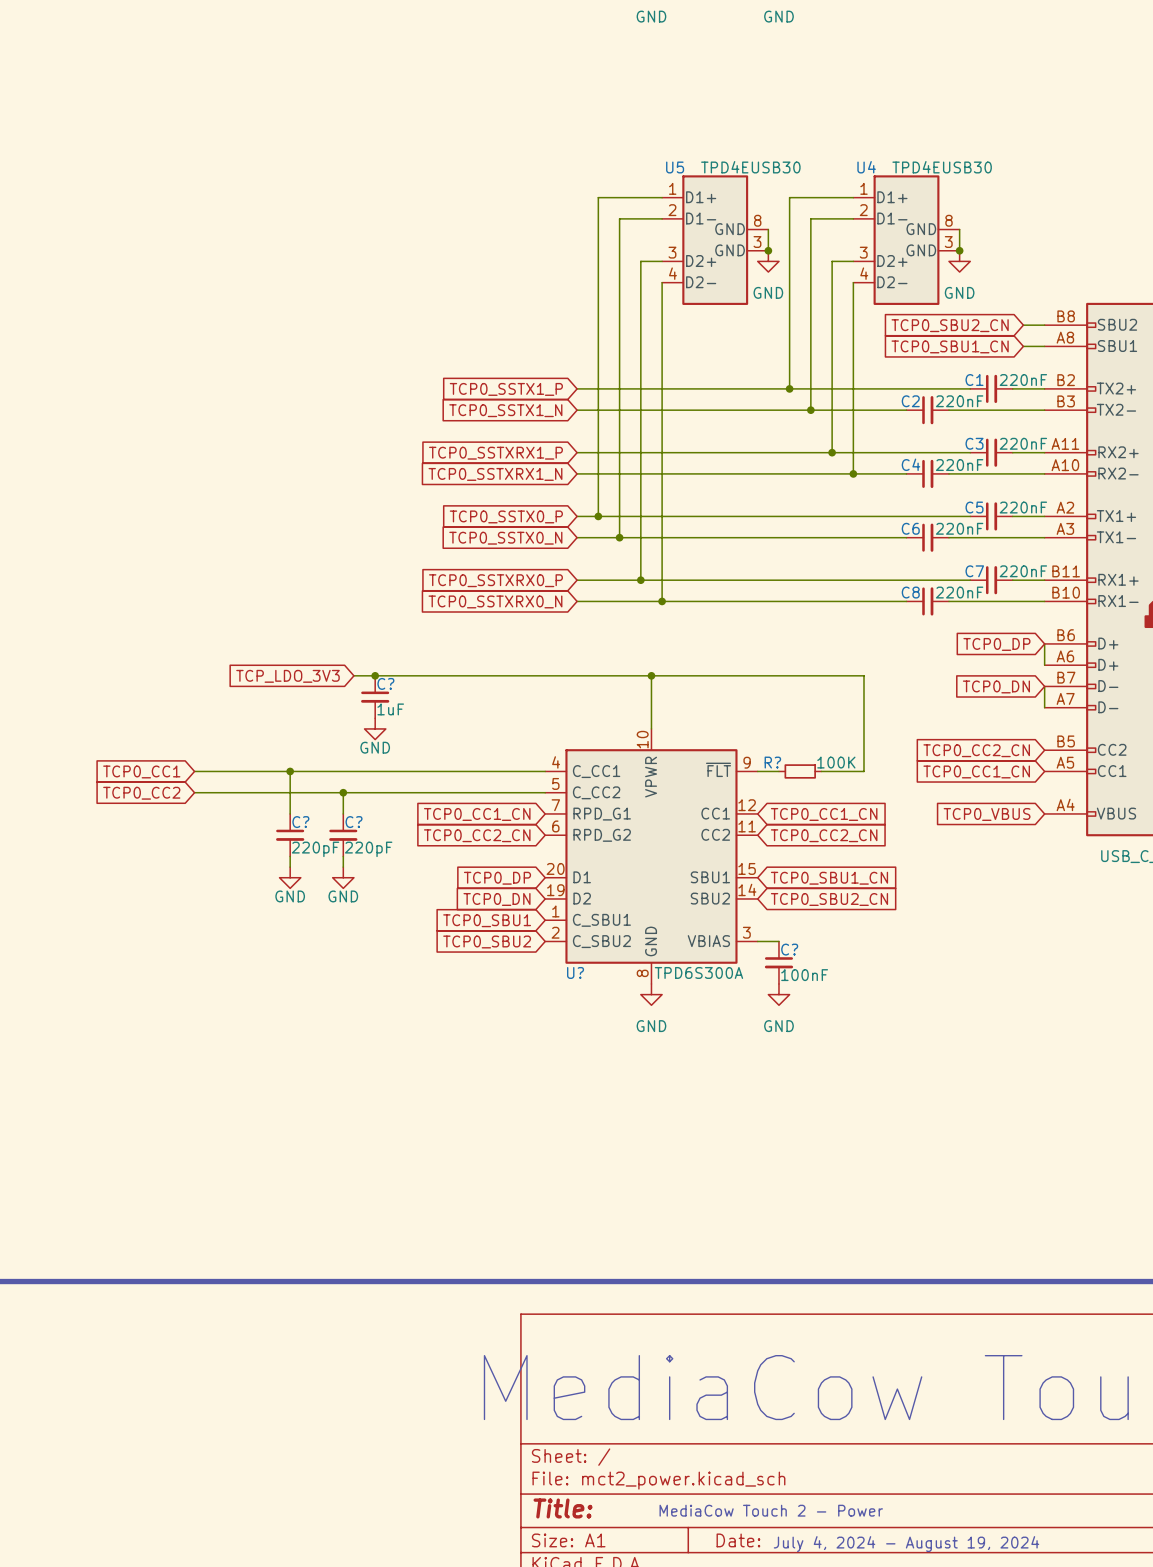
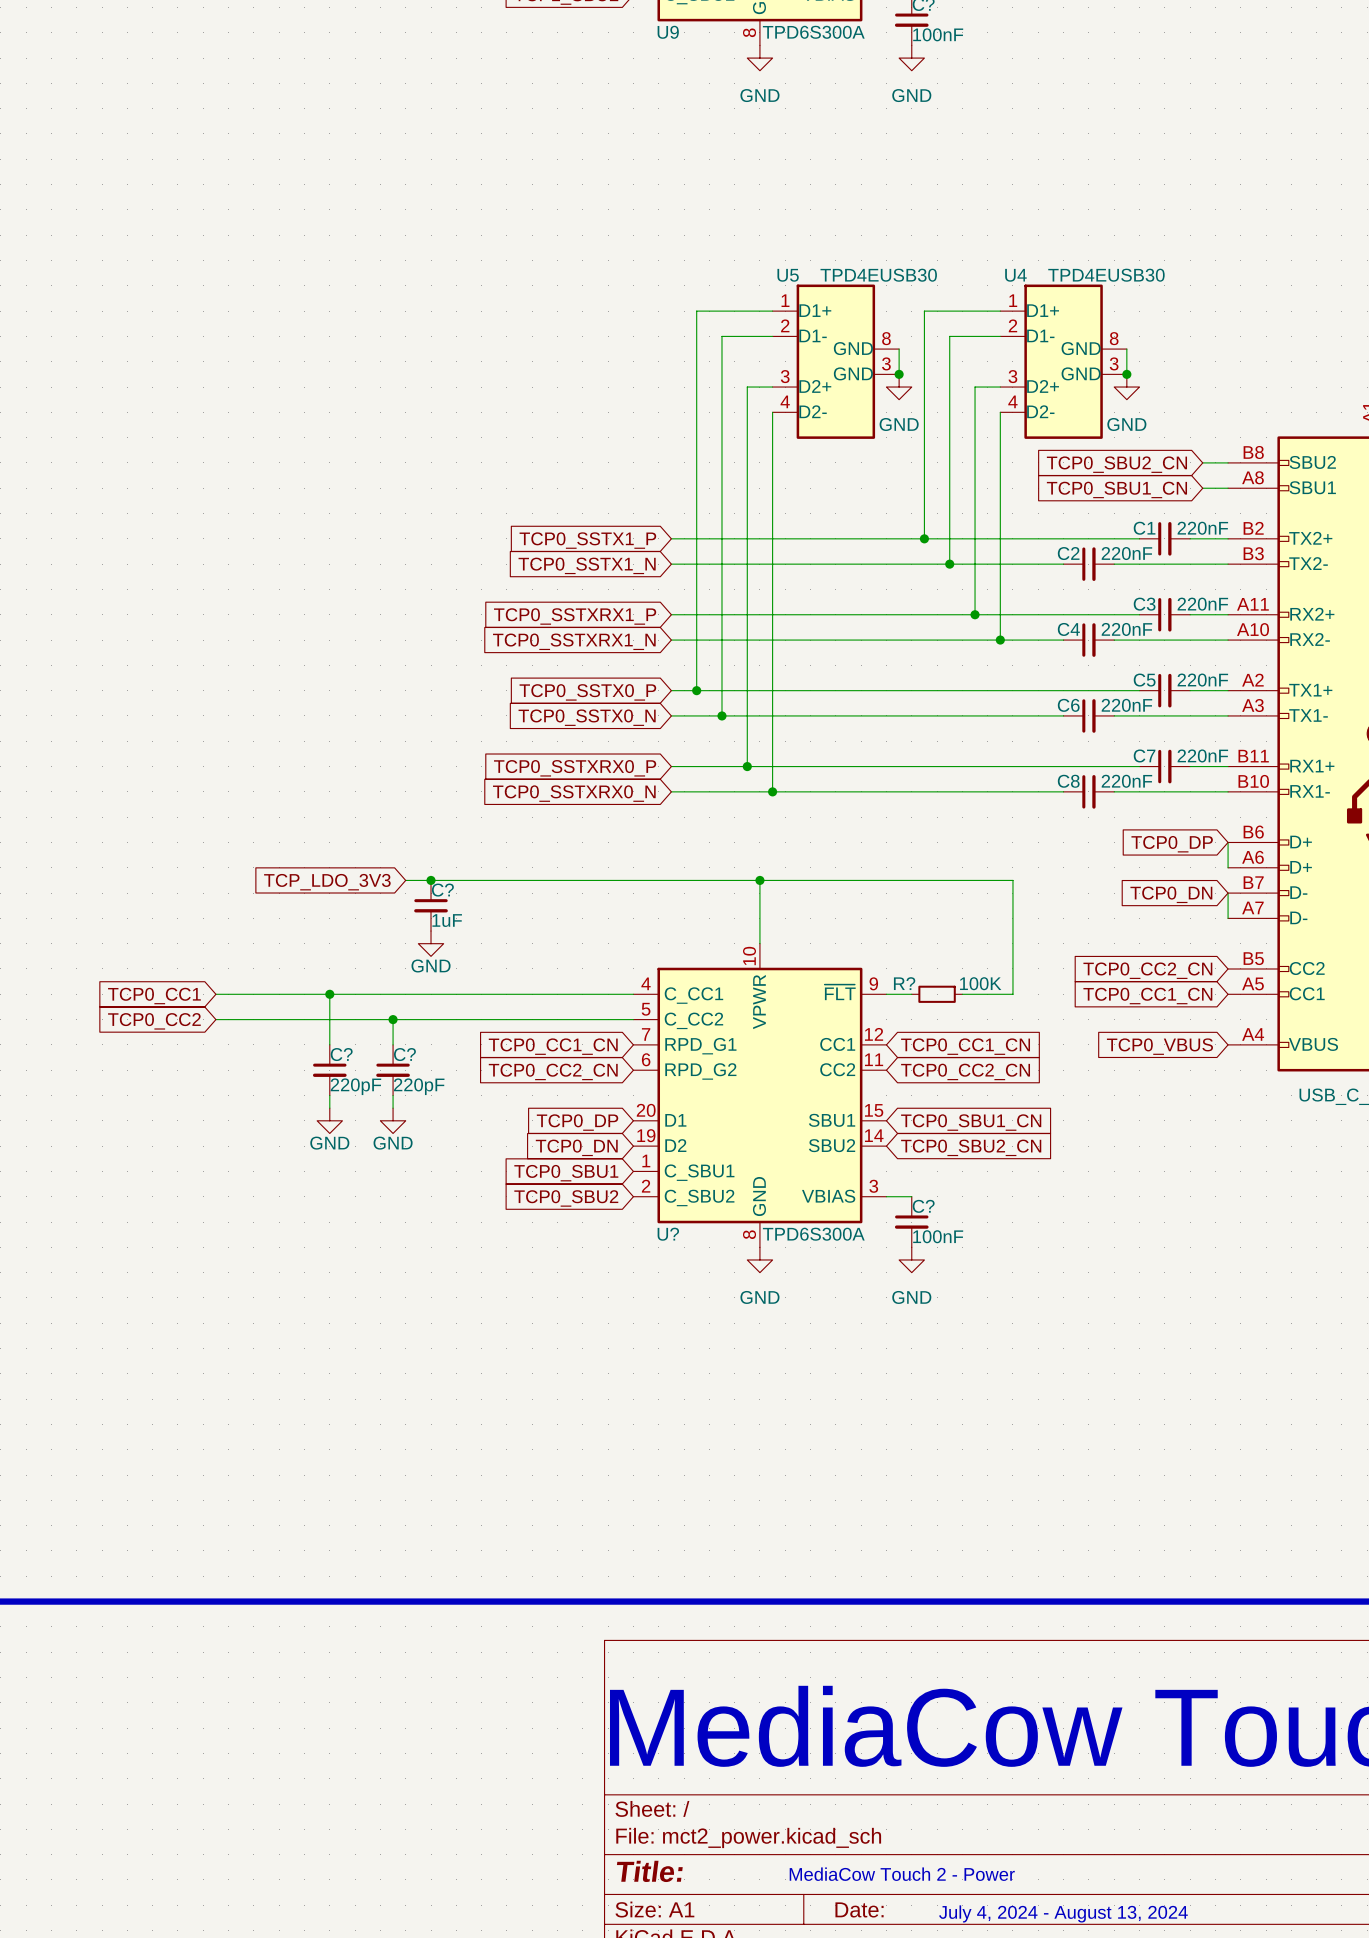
text: July 4, 2024 - August 19, 2024 (906, 1544) -> July 4, 2024 - August 13, 2024 (1063, 1913)

